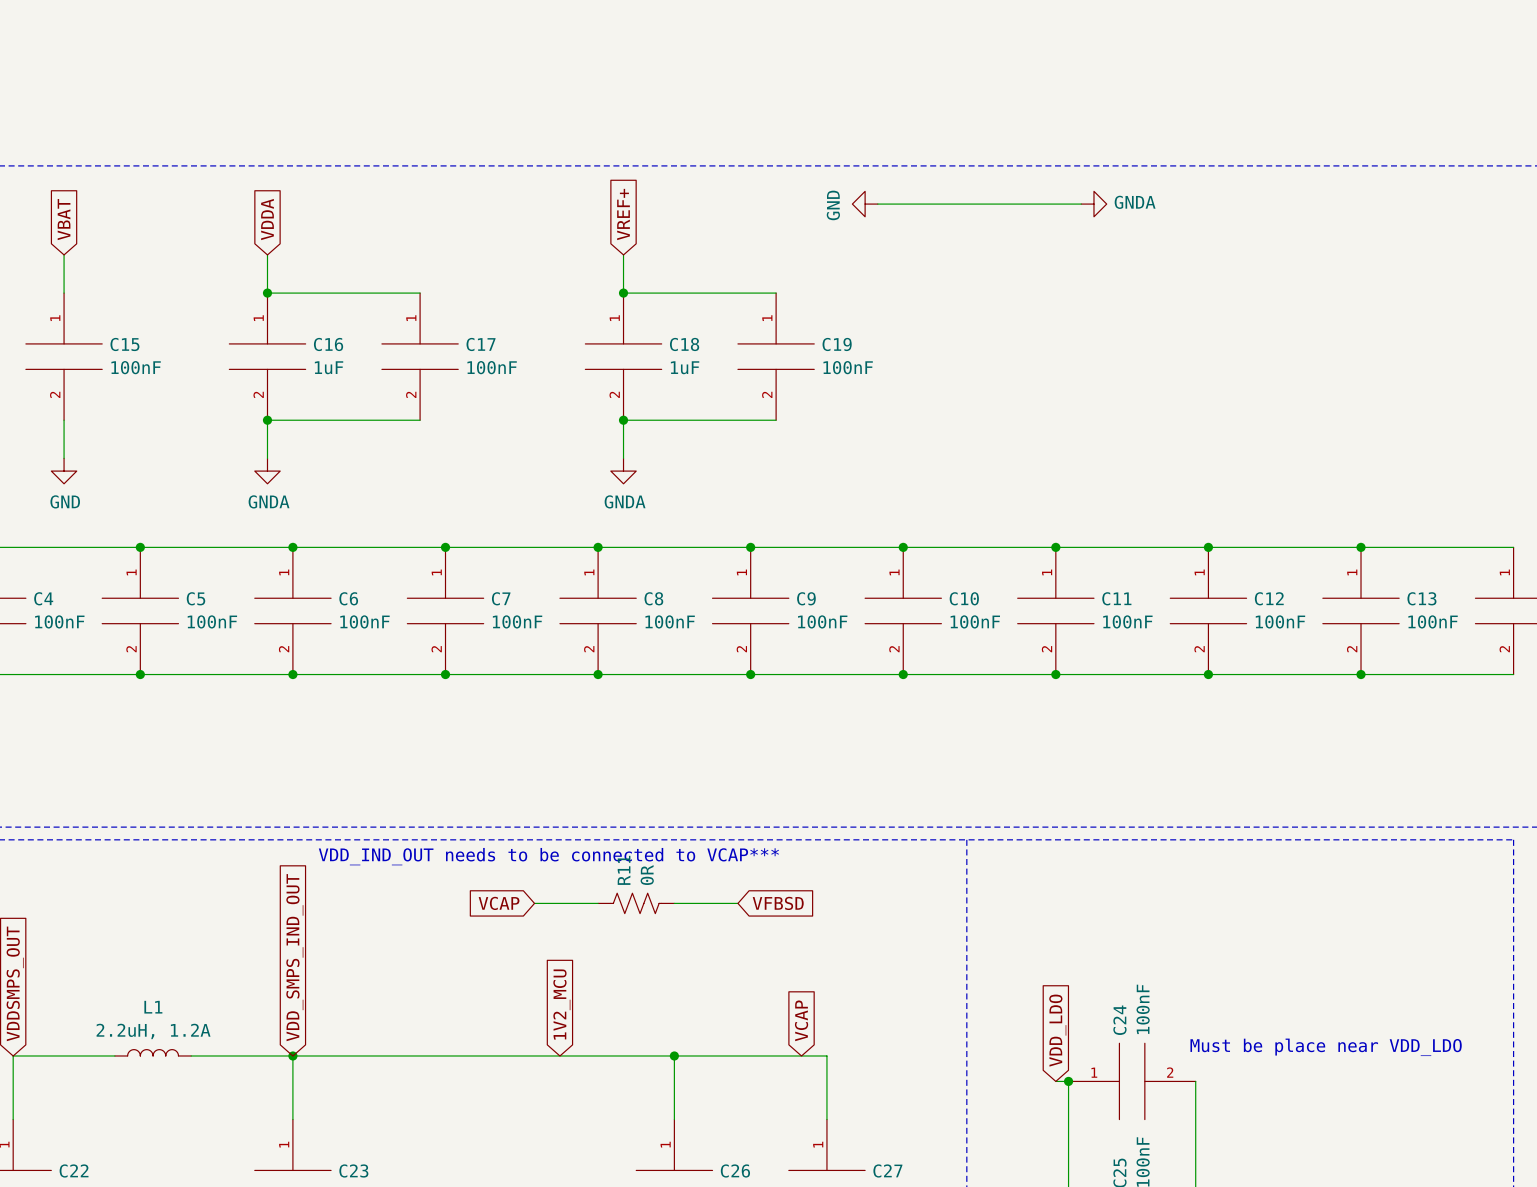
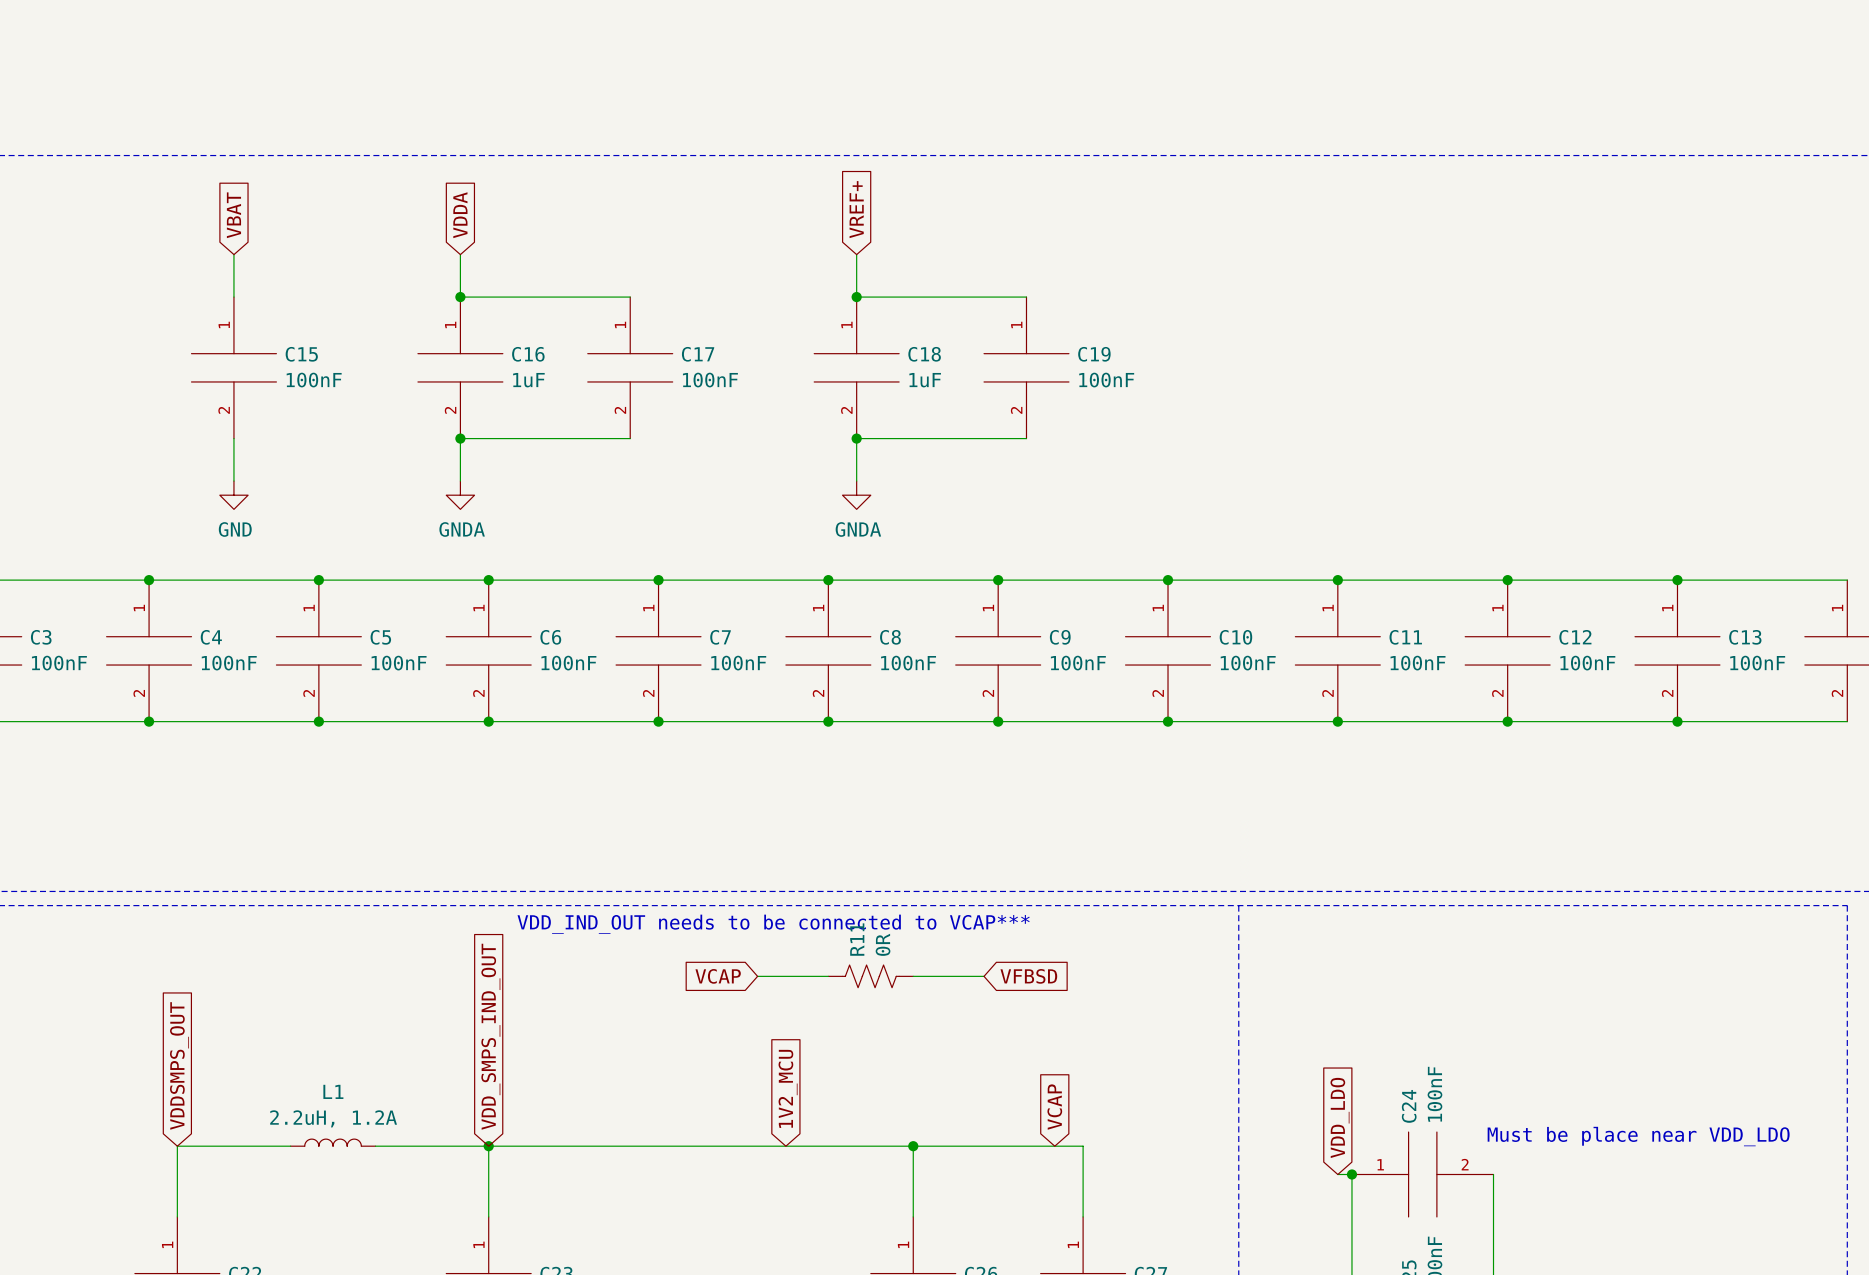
power symbol: GND (865, 204) -> none
wire: (877, 204) (1081, 204) -> none
power symbol: GNDA (1093, 204) -> none

